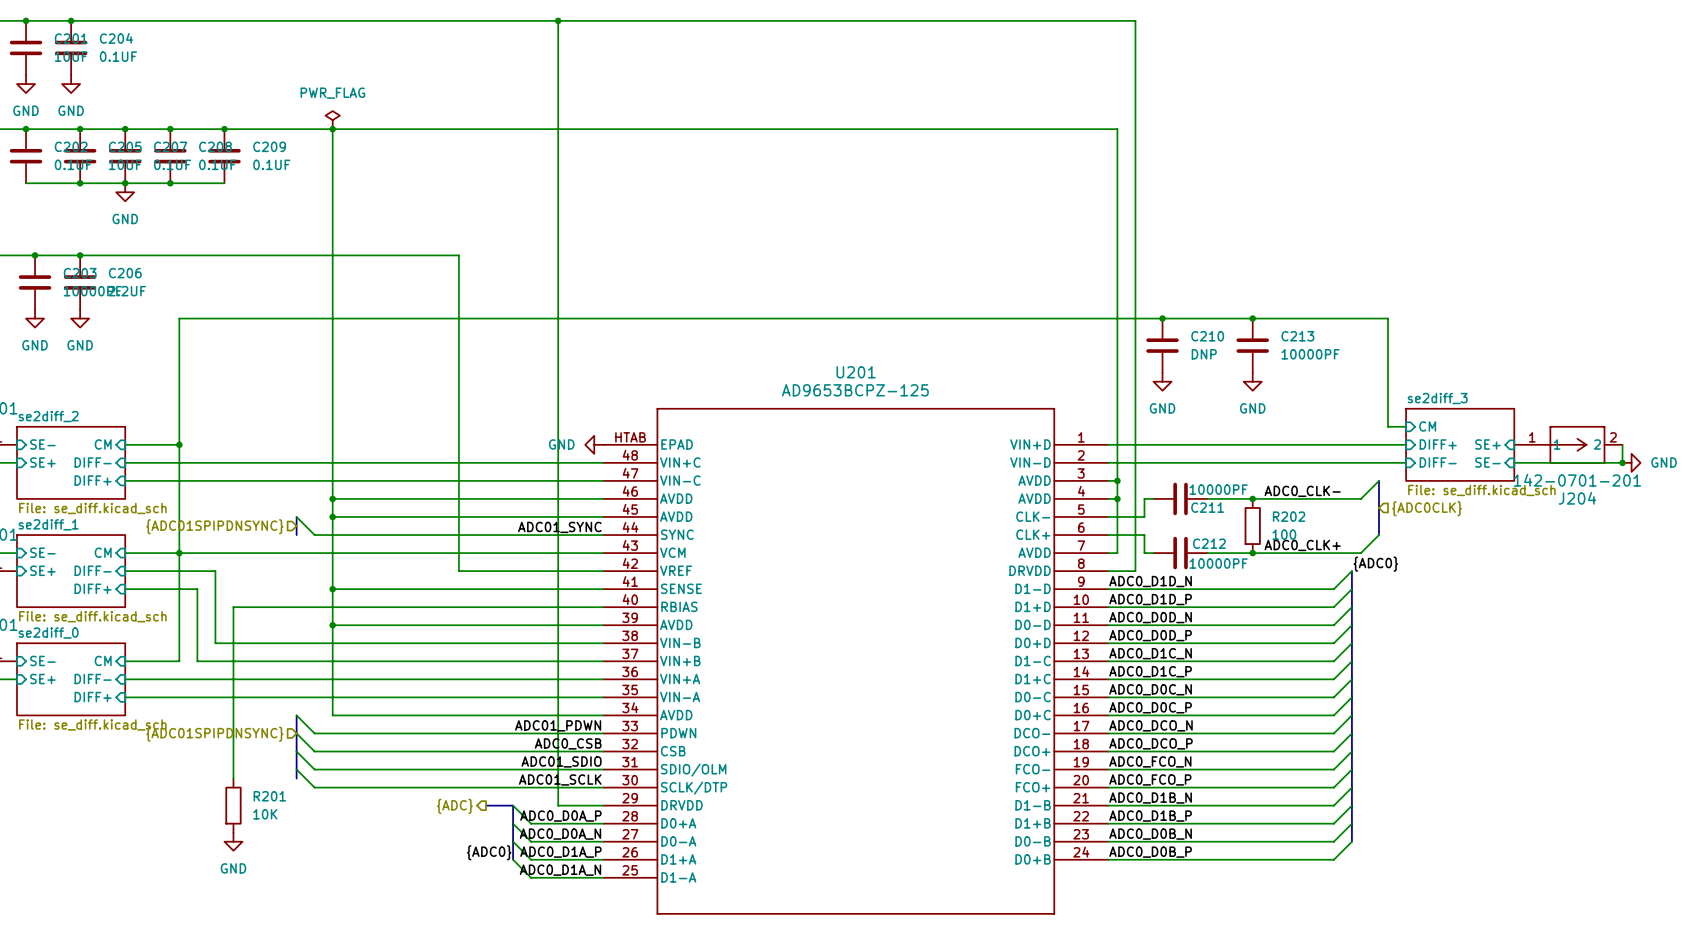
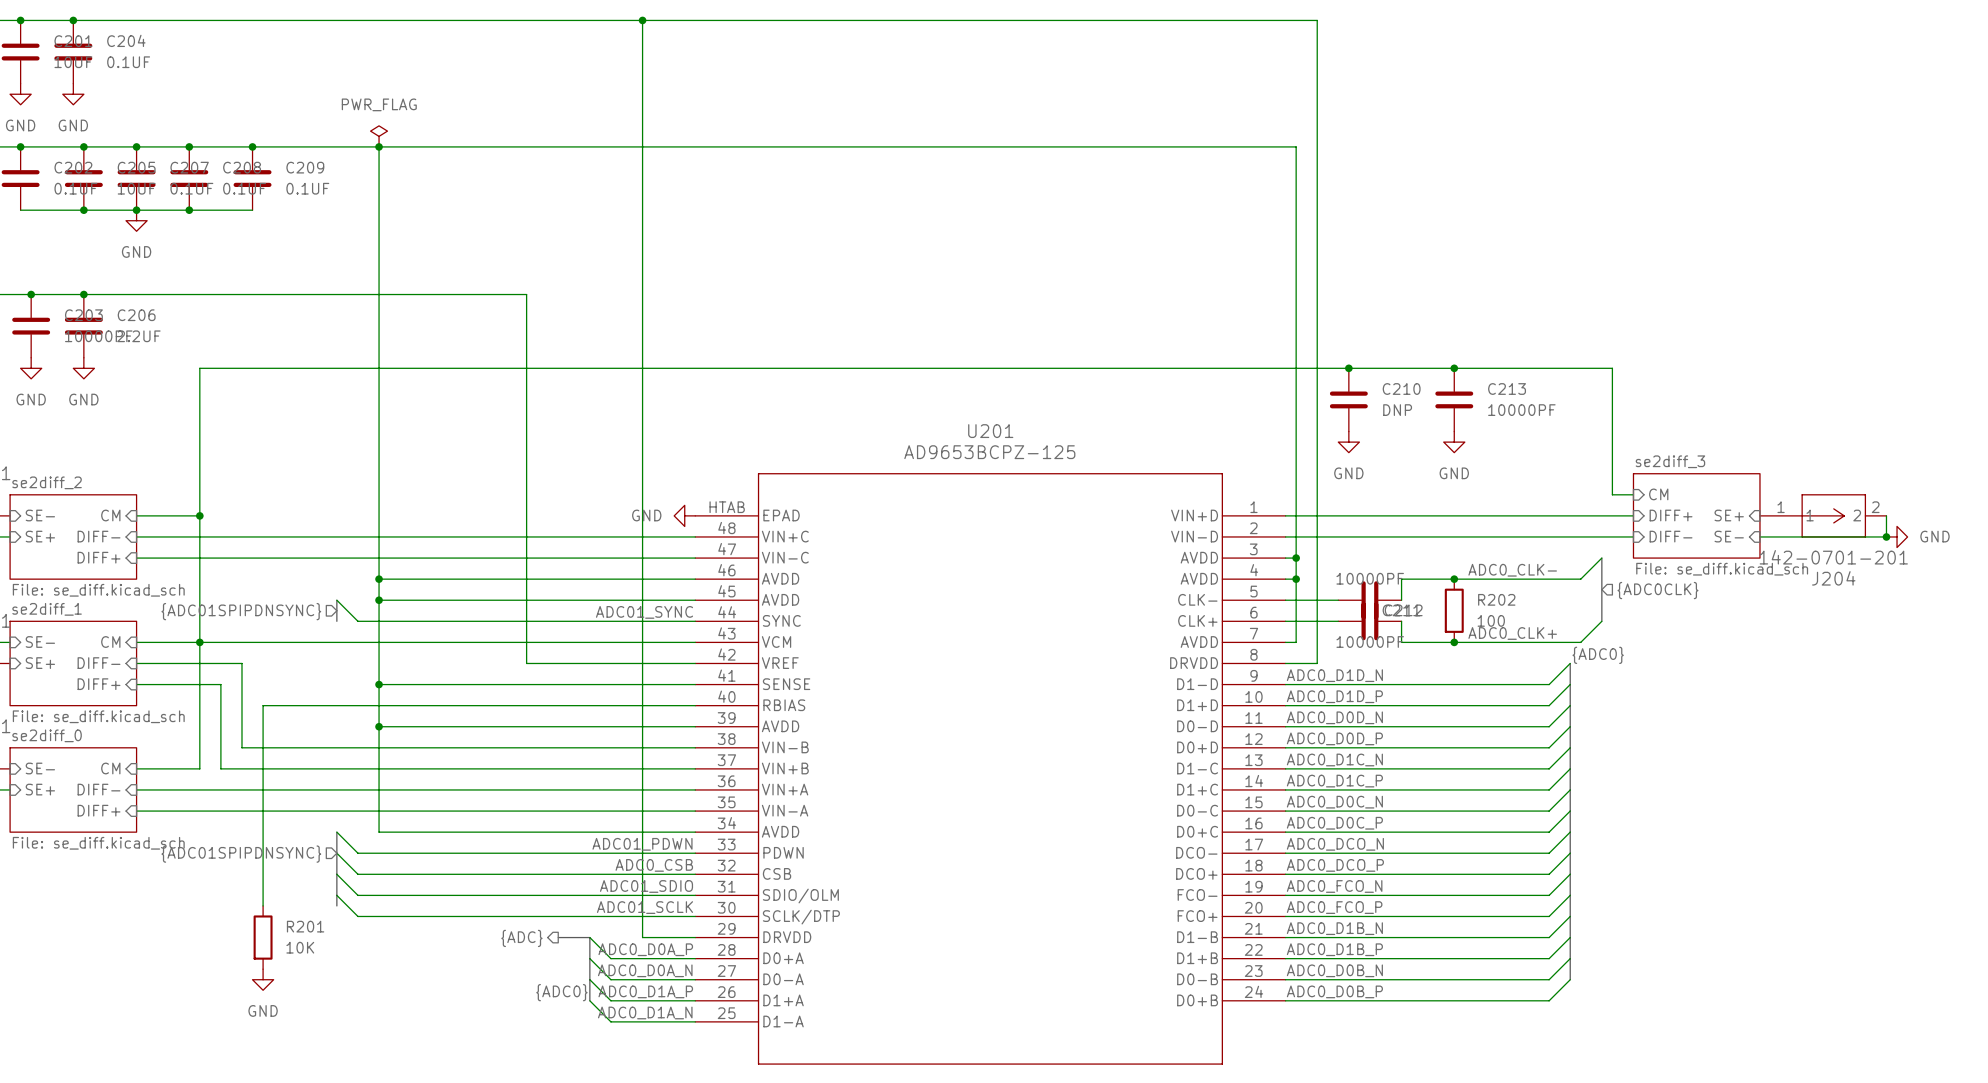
C212 value position: 10000PF (1218, 489) -> 10000PF (1370, 578)
wire: (1153, 498) (1144, 498) (1144, 516) -> (1338, 600) (1327, 600)
C211 position: (1180, 498) -> (1369, 600)
wire: none -> (1401, 579) (1401, 600)
wire: (1144, 535) (1144, 553) (1153, 553) -> (1327, 621) (1338, 621)
wire: none -> (1401, 621) (1401, 642)
C212 position: (1180, 553) -> (1369, 621)
C211 value position: 10000PF (1218, 563) -> 10000PF (1370, 642)

